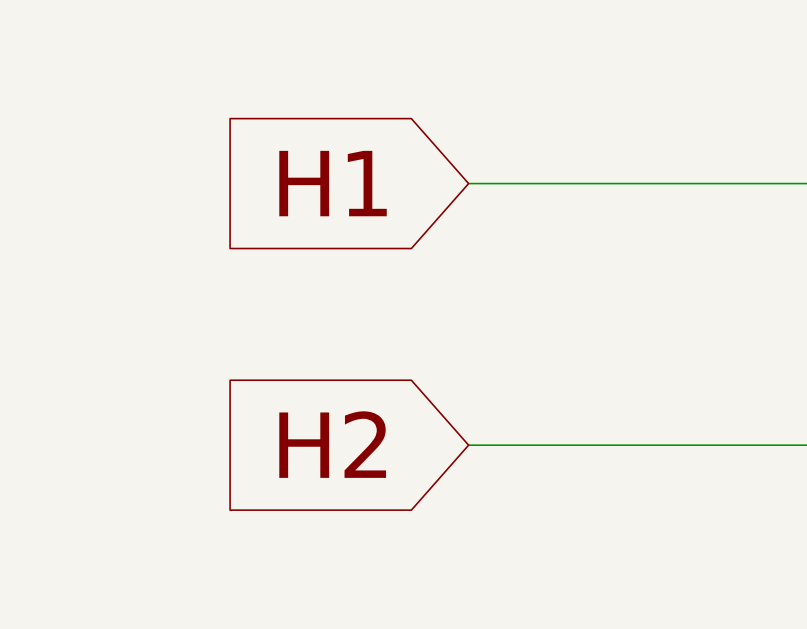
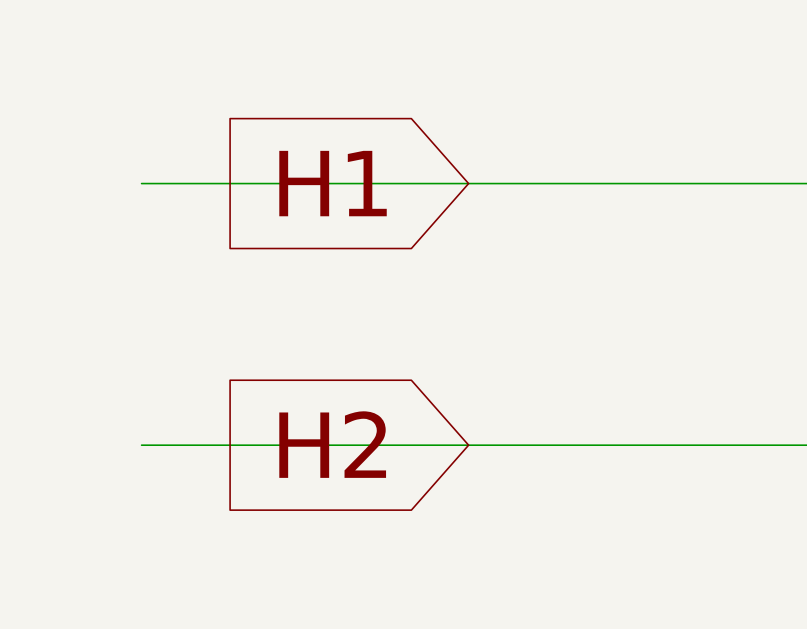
wire: none -> (141, 183) (468, 183)
wire: none -> (141, 445) (468, 445)

